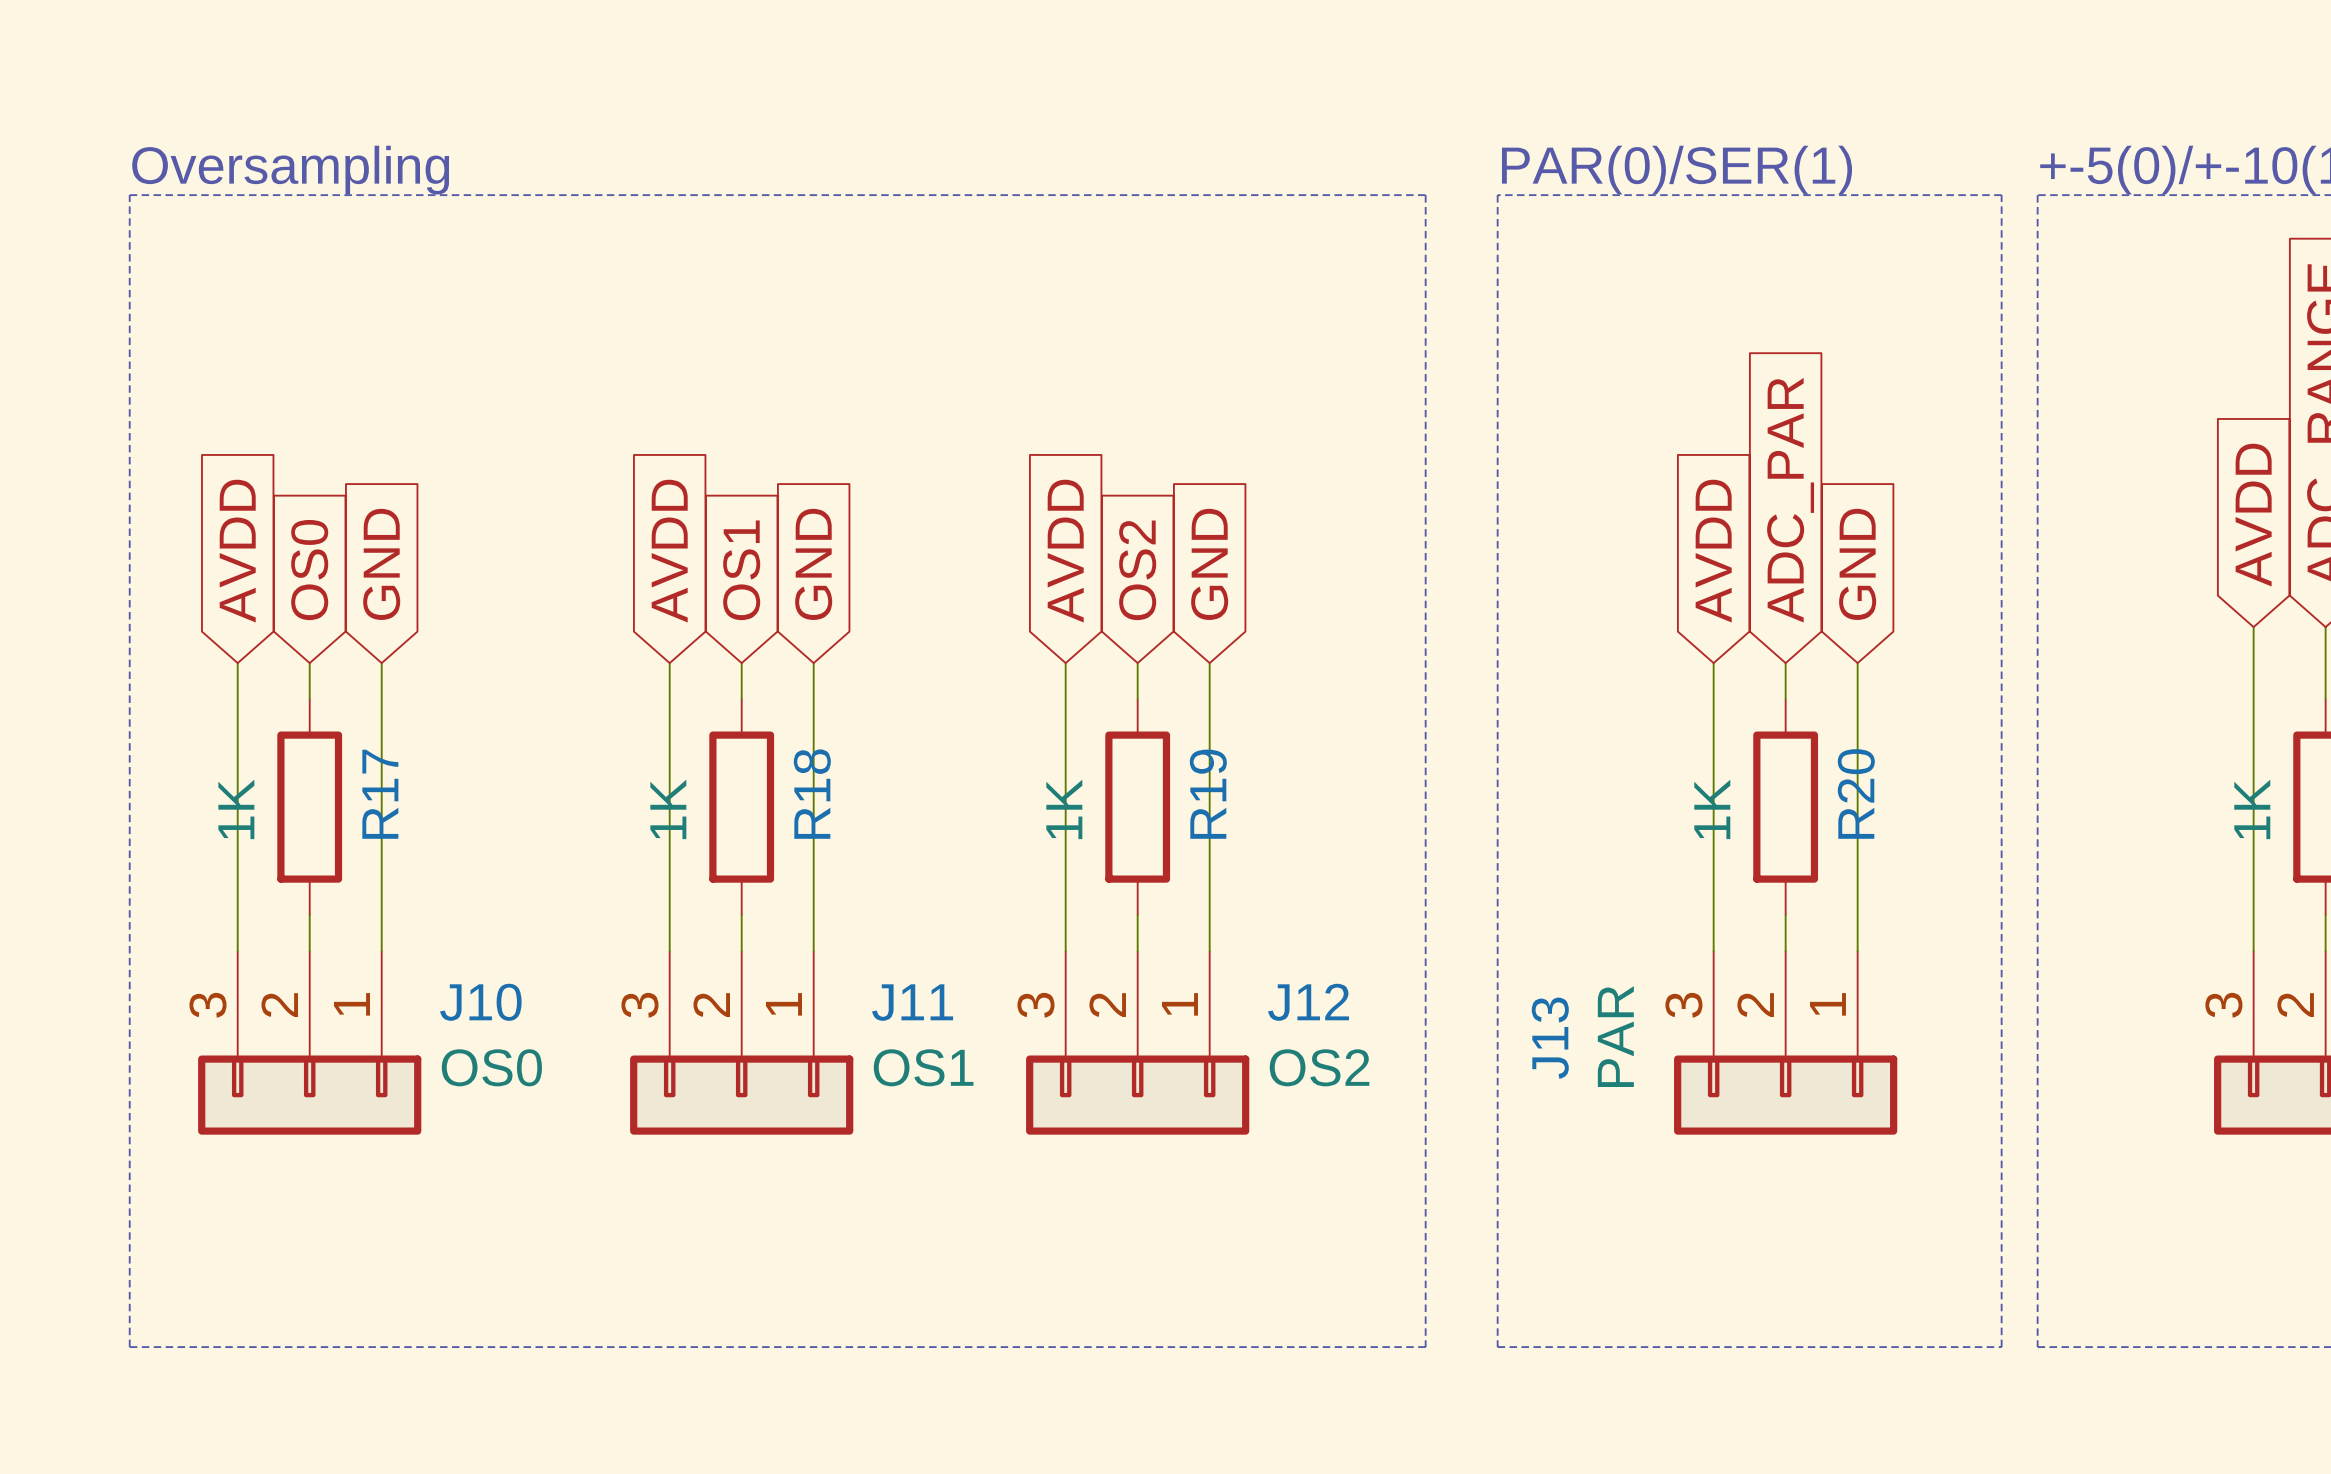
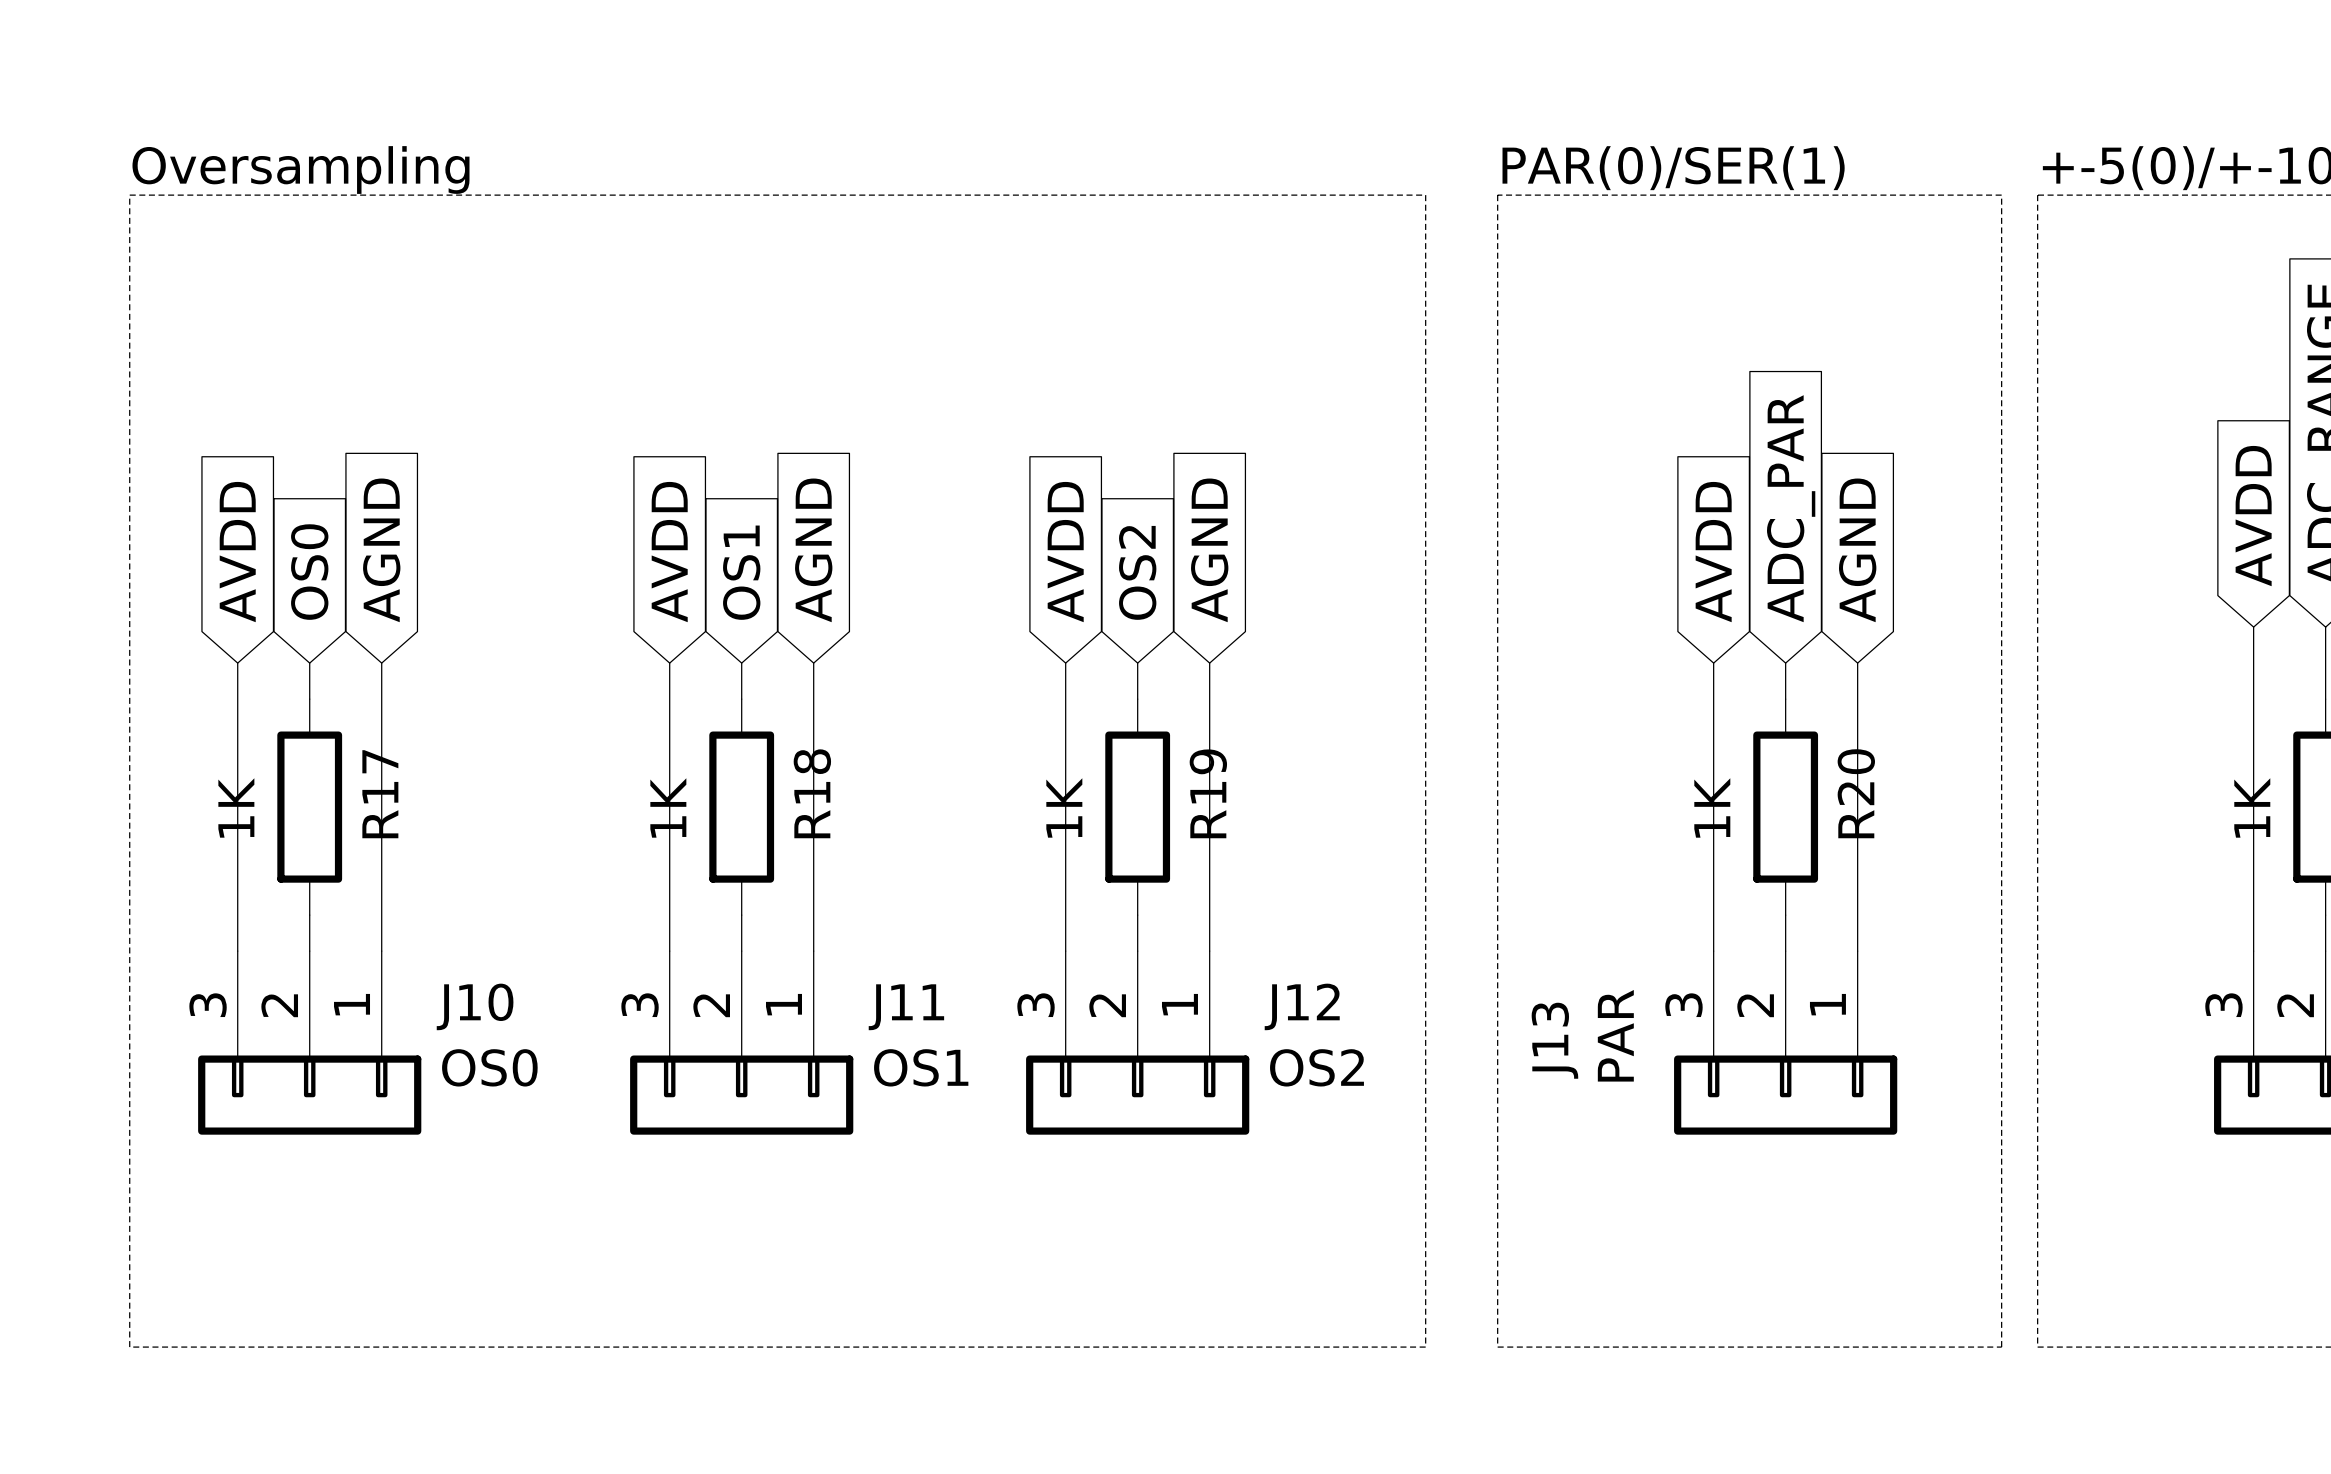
global label: GND (381, 564) -> AGND (381, 550)
global label: GND (813, 564) -> AGND (813, 550)
global label: GND (1209, 564) -> AGND (1209, 550)
global label: GND (1857, 564) -> AGND (1857, 550)

